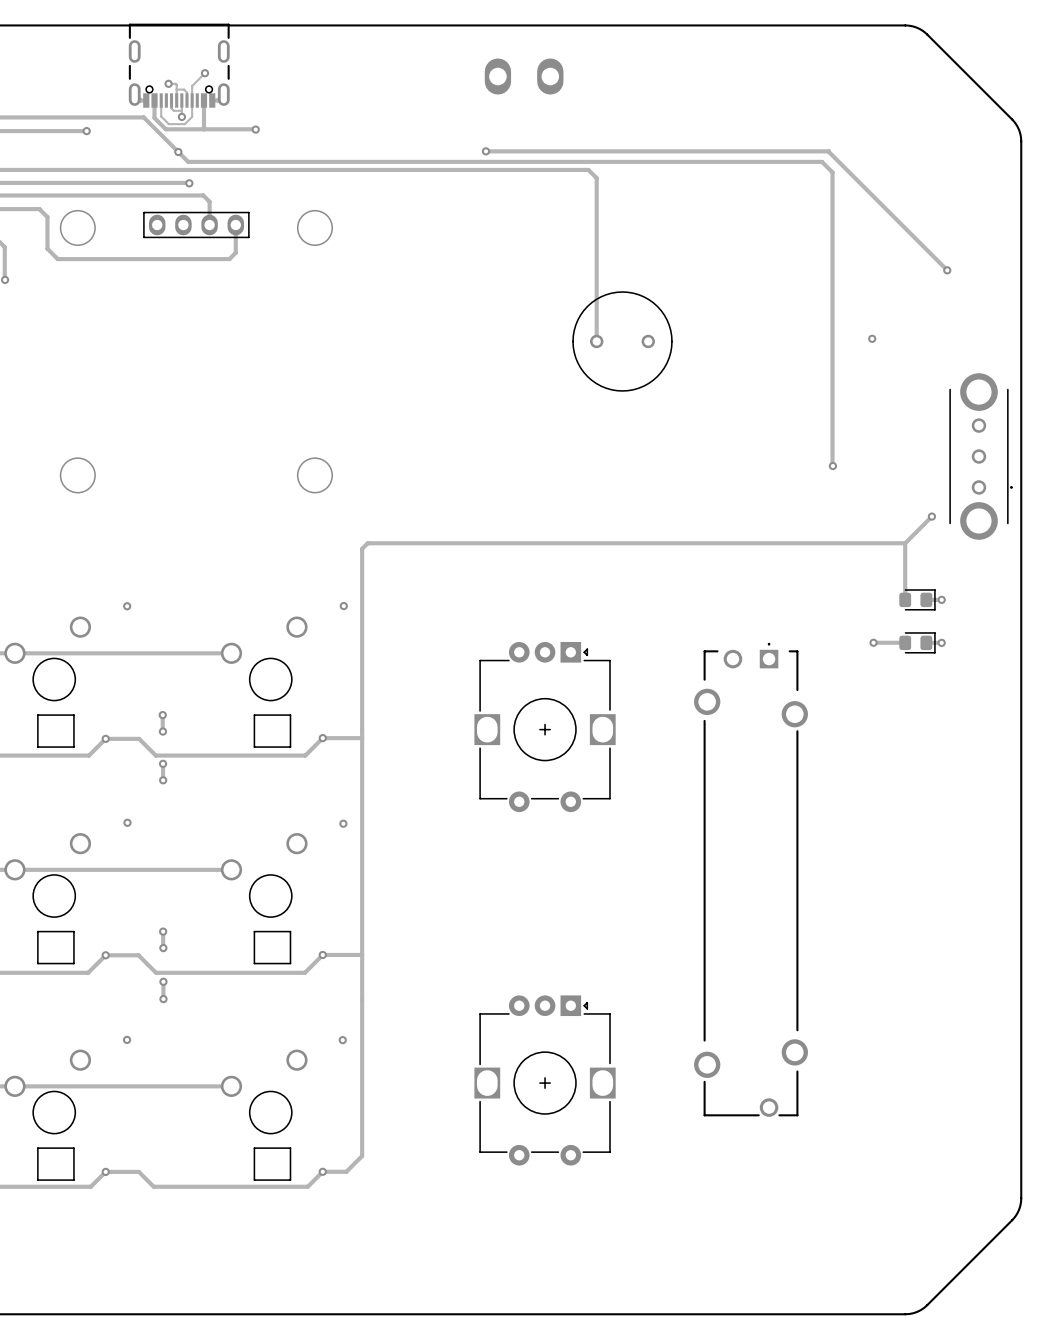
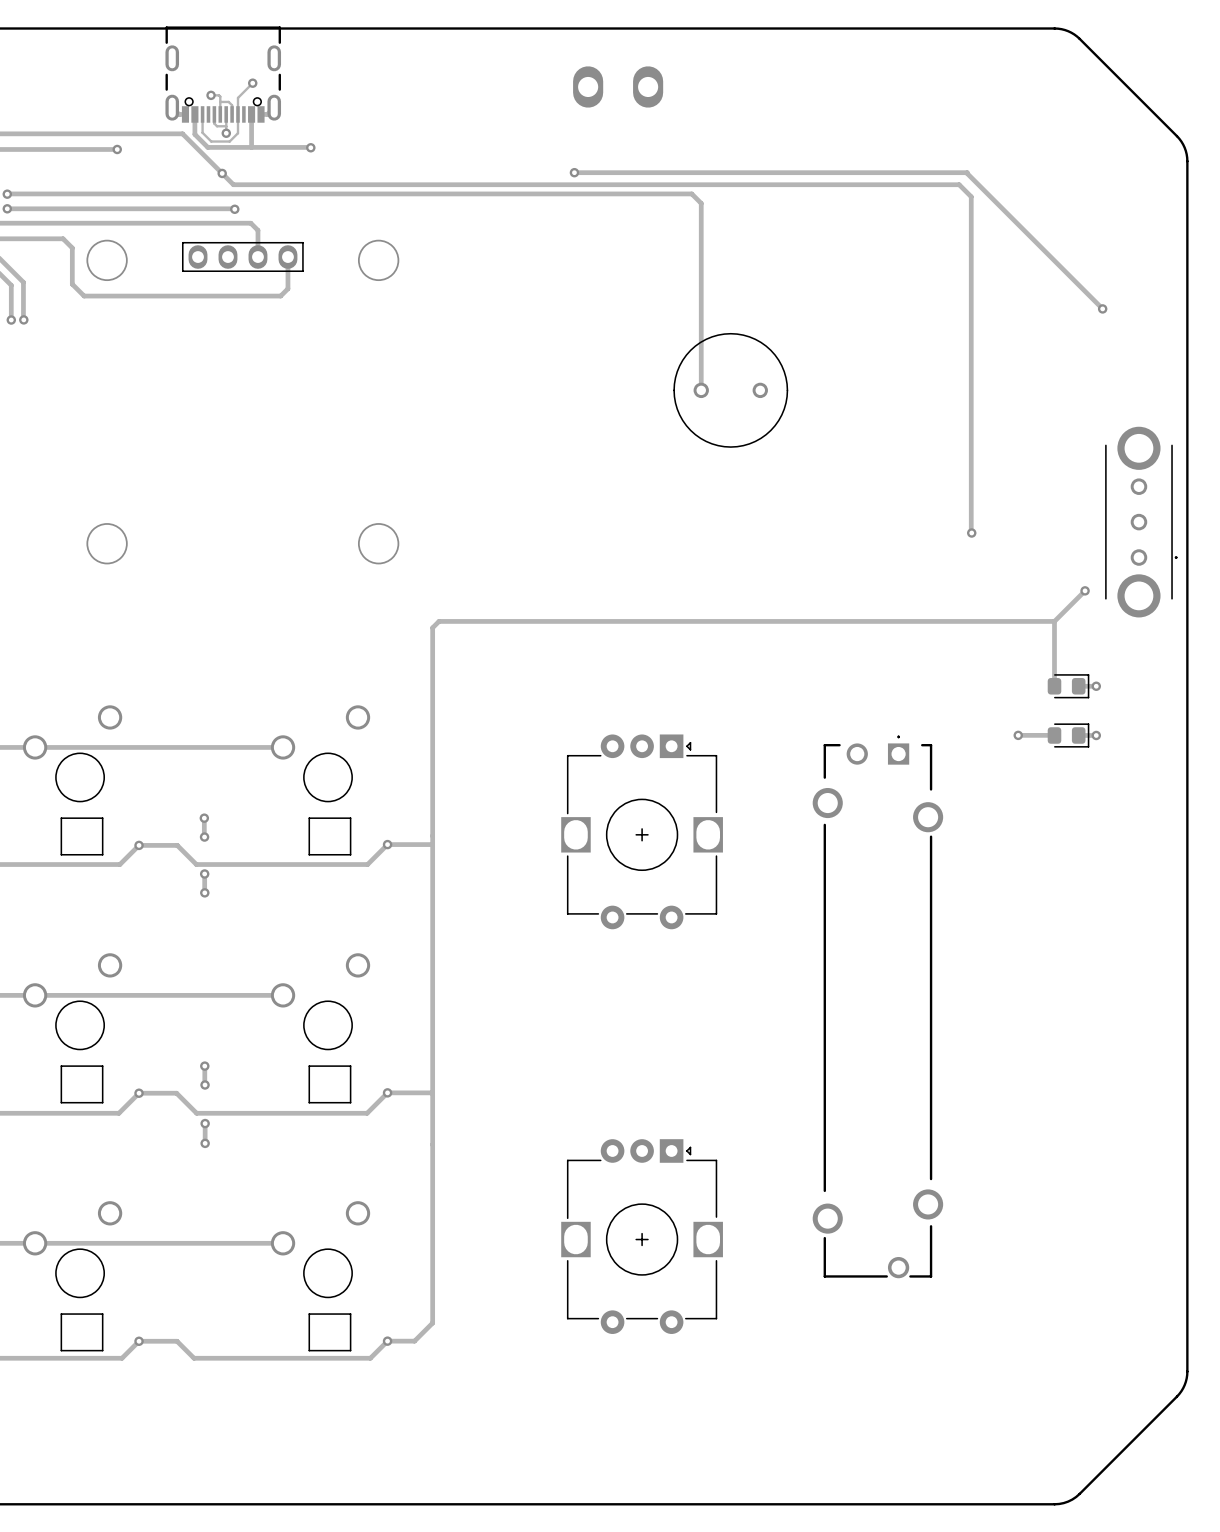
via: (872, 338) -> none
via: (127, 606) -> none
via: (343, 606) -> none
via: (127, 822) -> none
via: (343, 823) -> none
via: (127, 1039) -> none
via: (342, 1040) -> none

